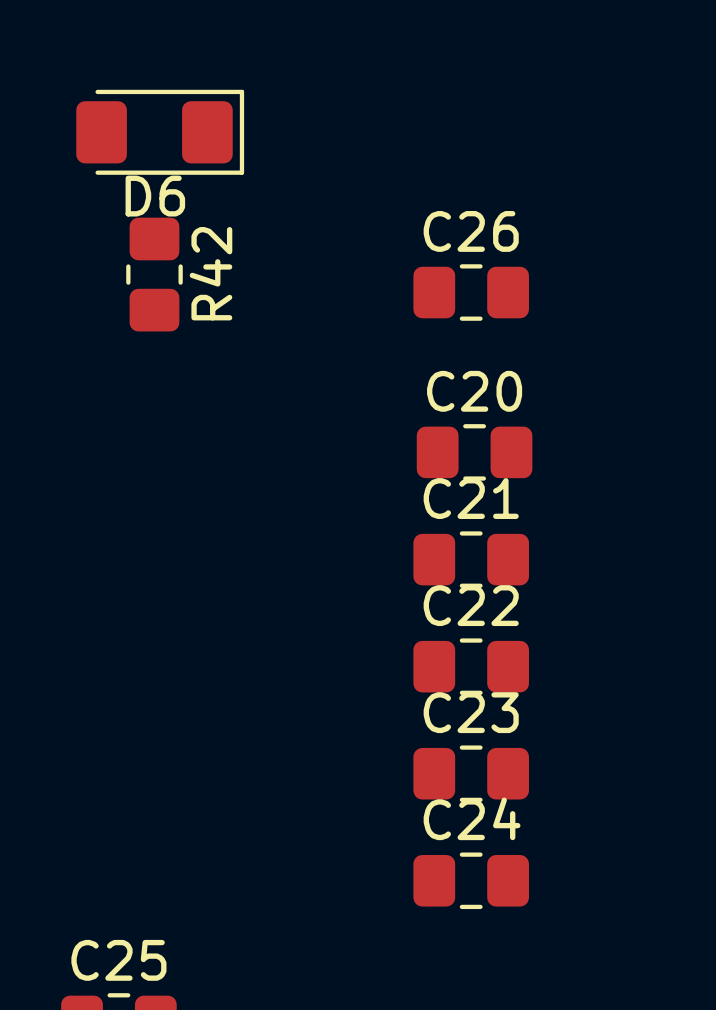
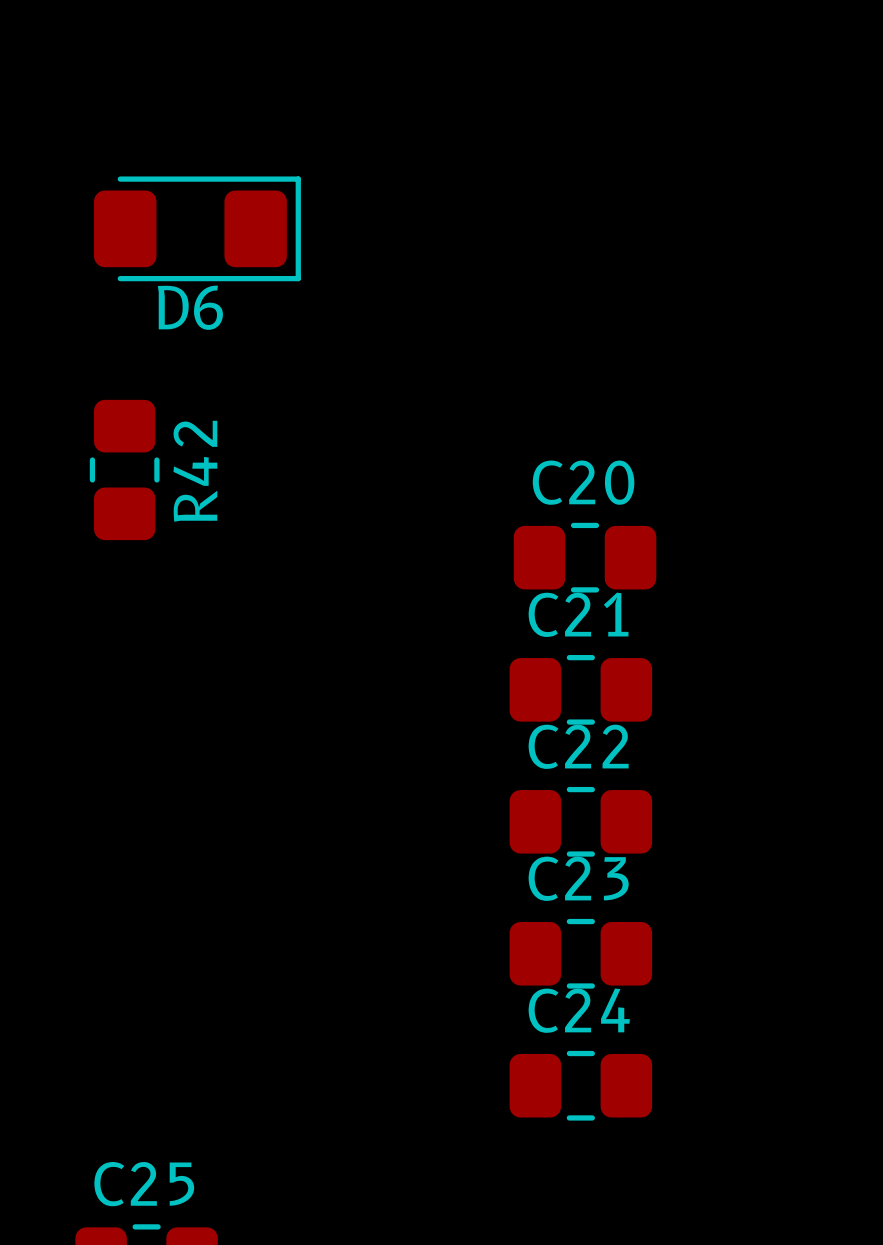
D6 position: (160, 132) -> (197, 228)
R42 position: (154, 274) -> (124, 469)
C26: (471, 292) -> none

